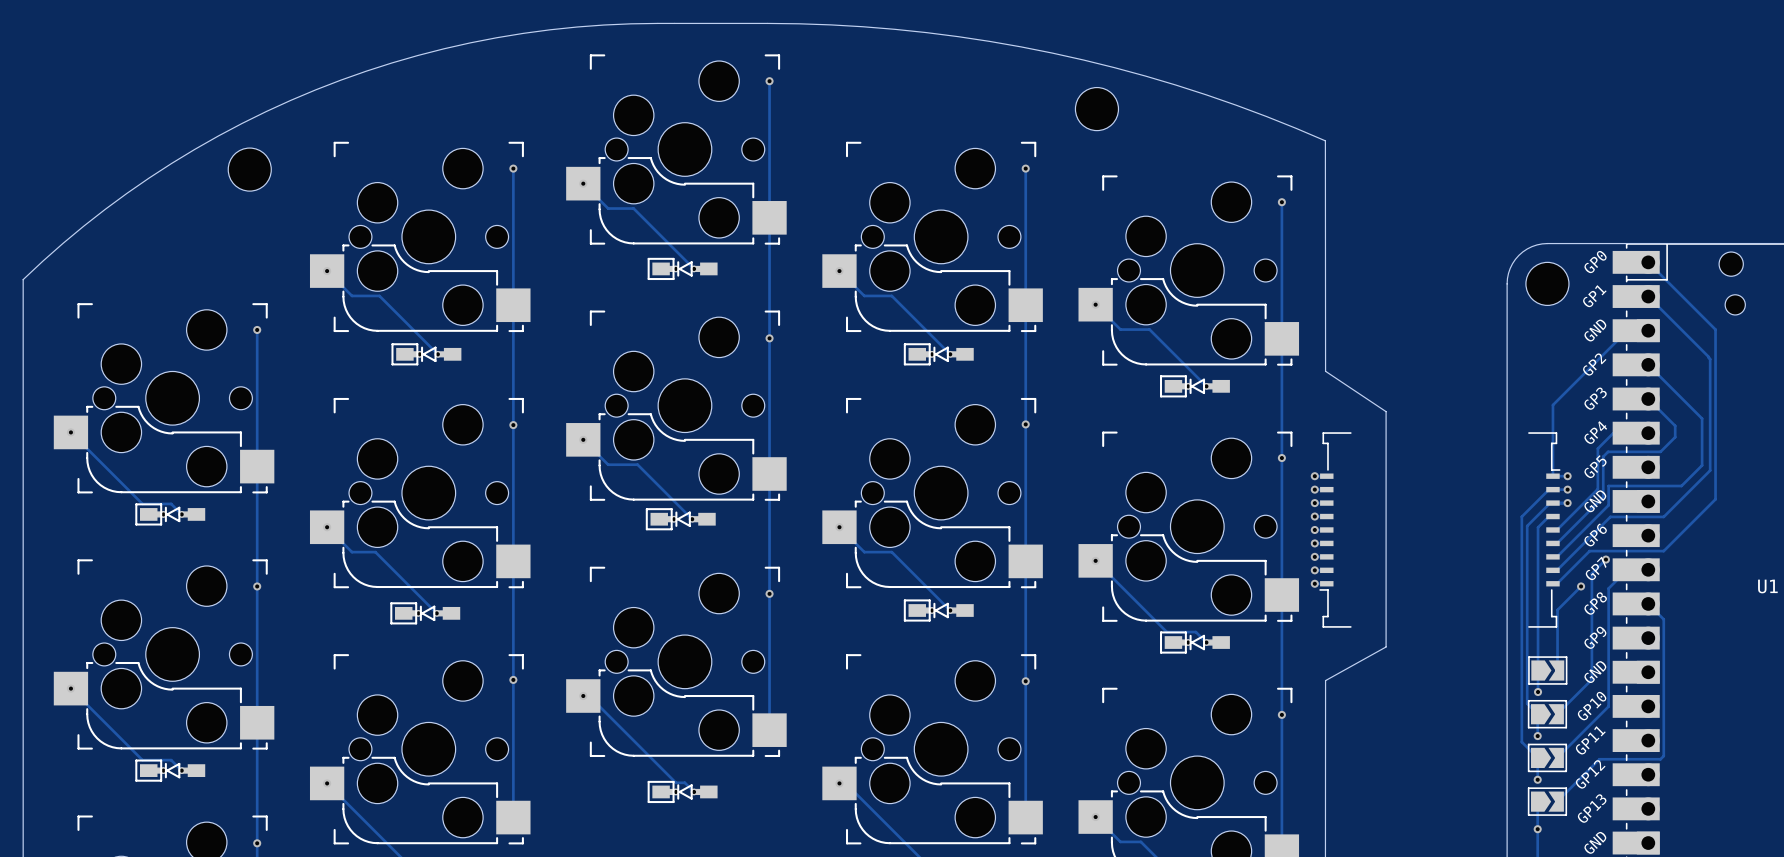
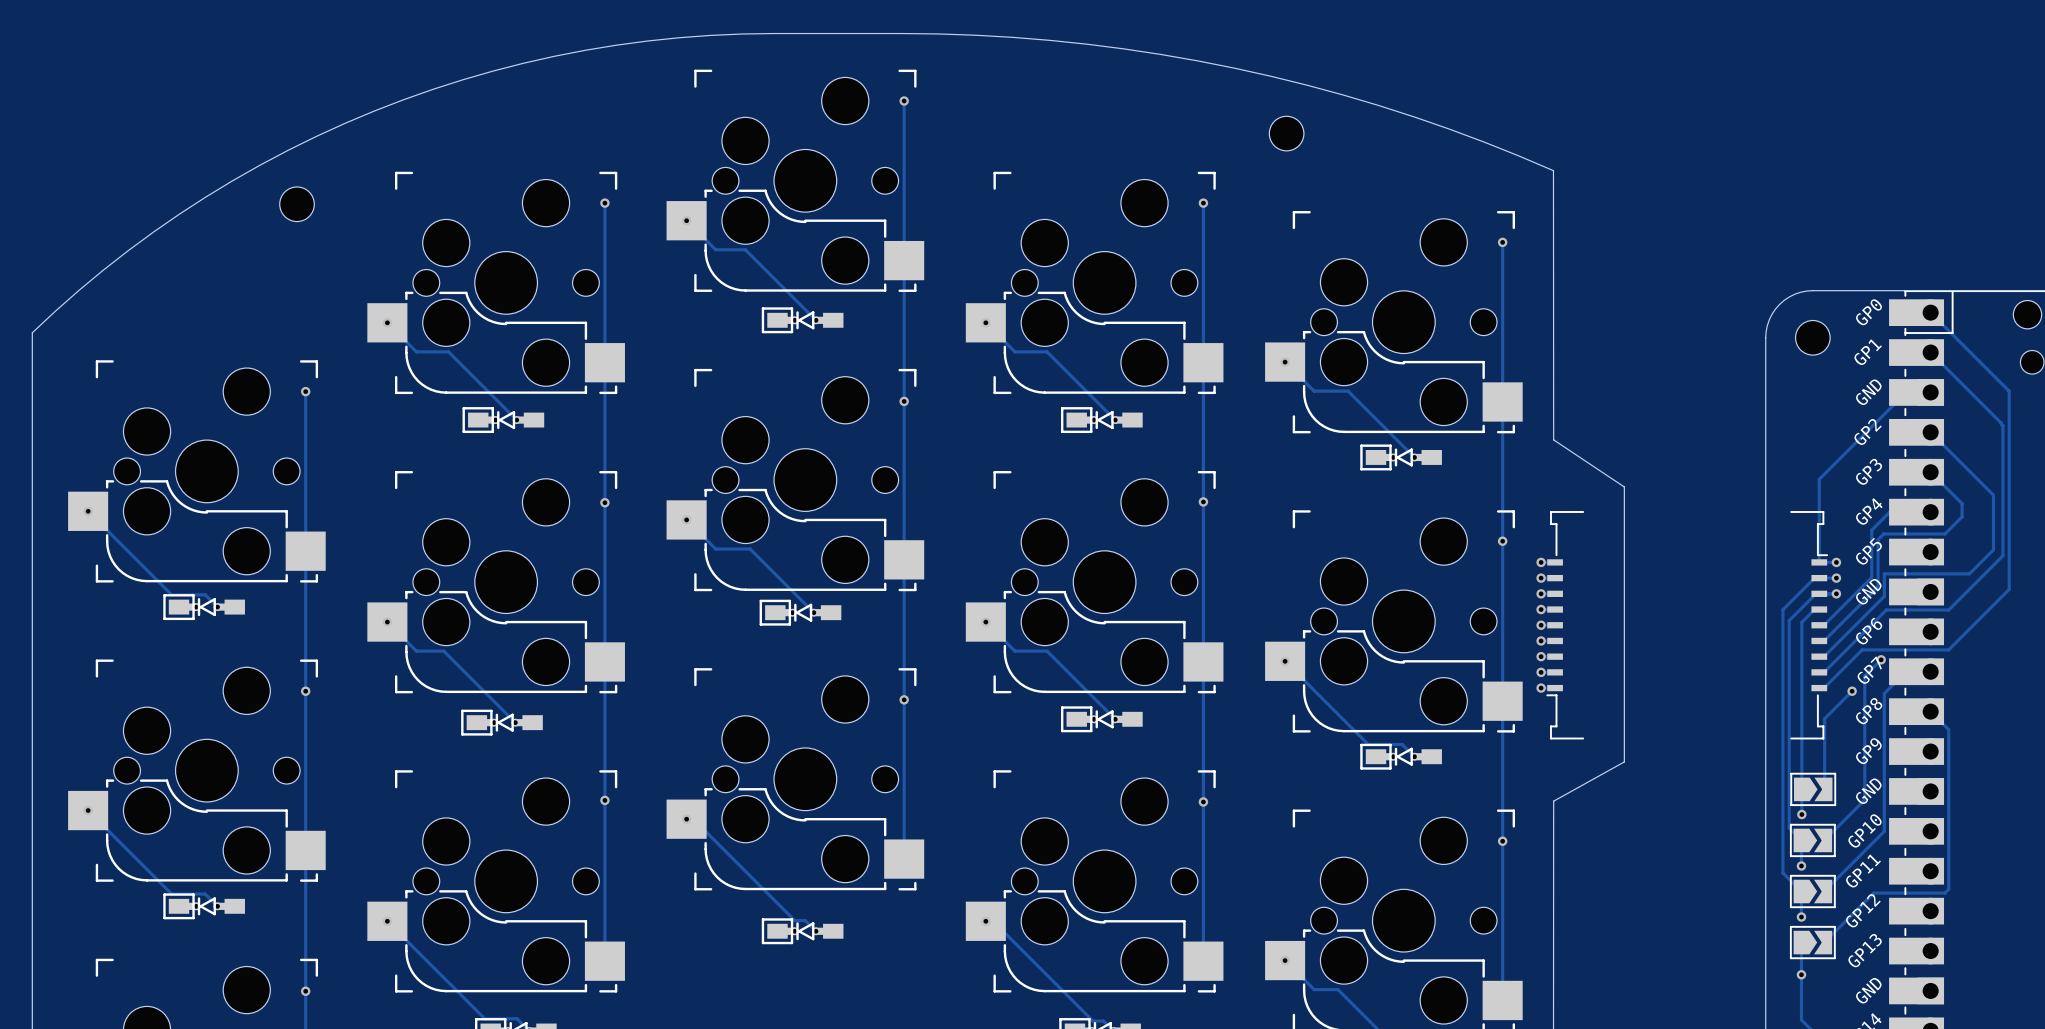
part footprint: [1075, 87, 1119, 131] -> [1269, 116, 1304, 151]
part footprint: [228, 148, 272, 192] -> [279, 186, 315, 222]
part footprint: [1525, 262, 1569, 306] -> [1795, 320, 1831, 356]

